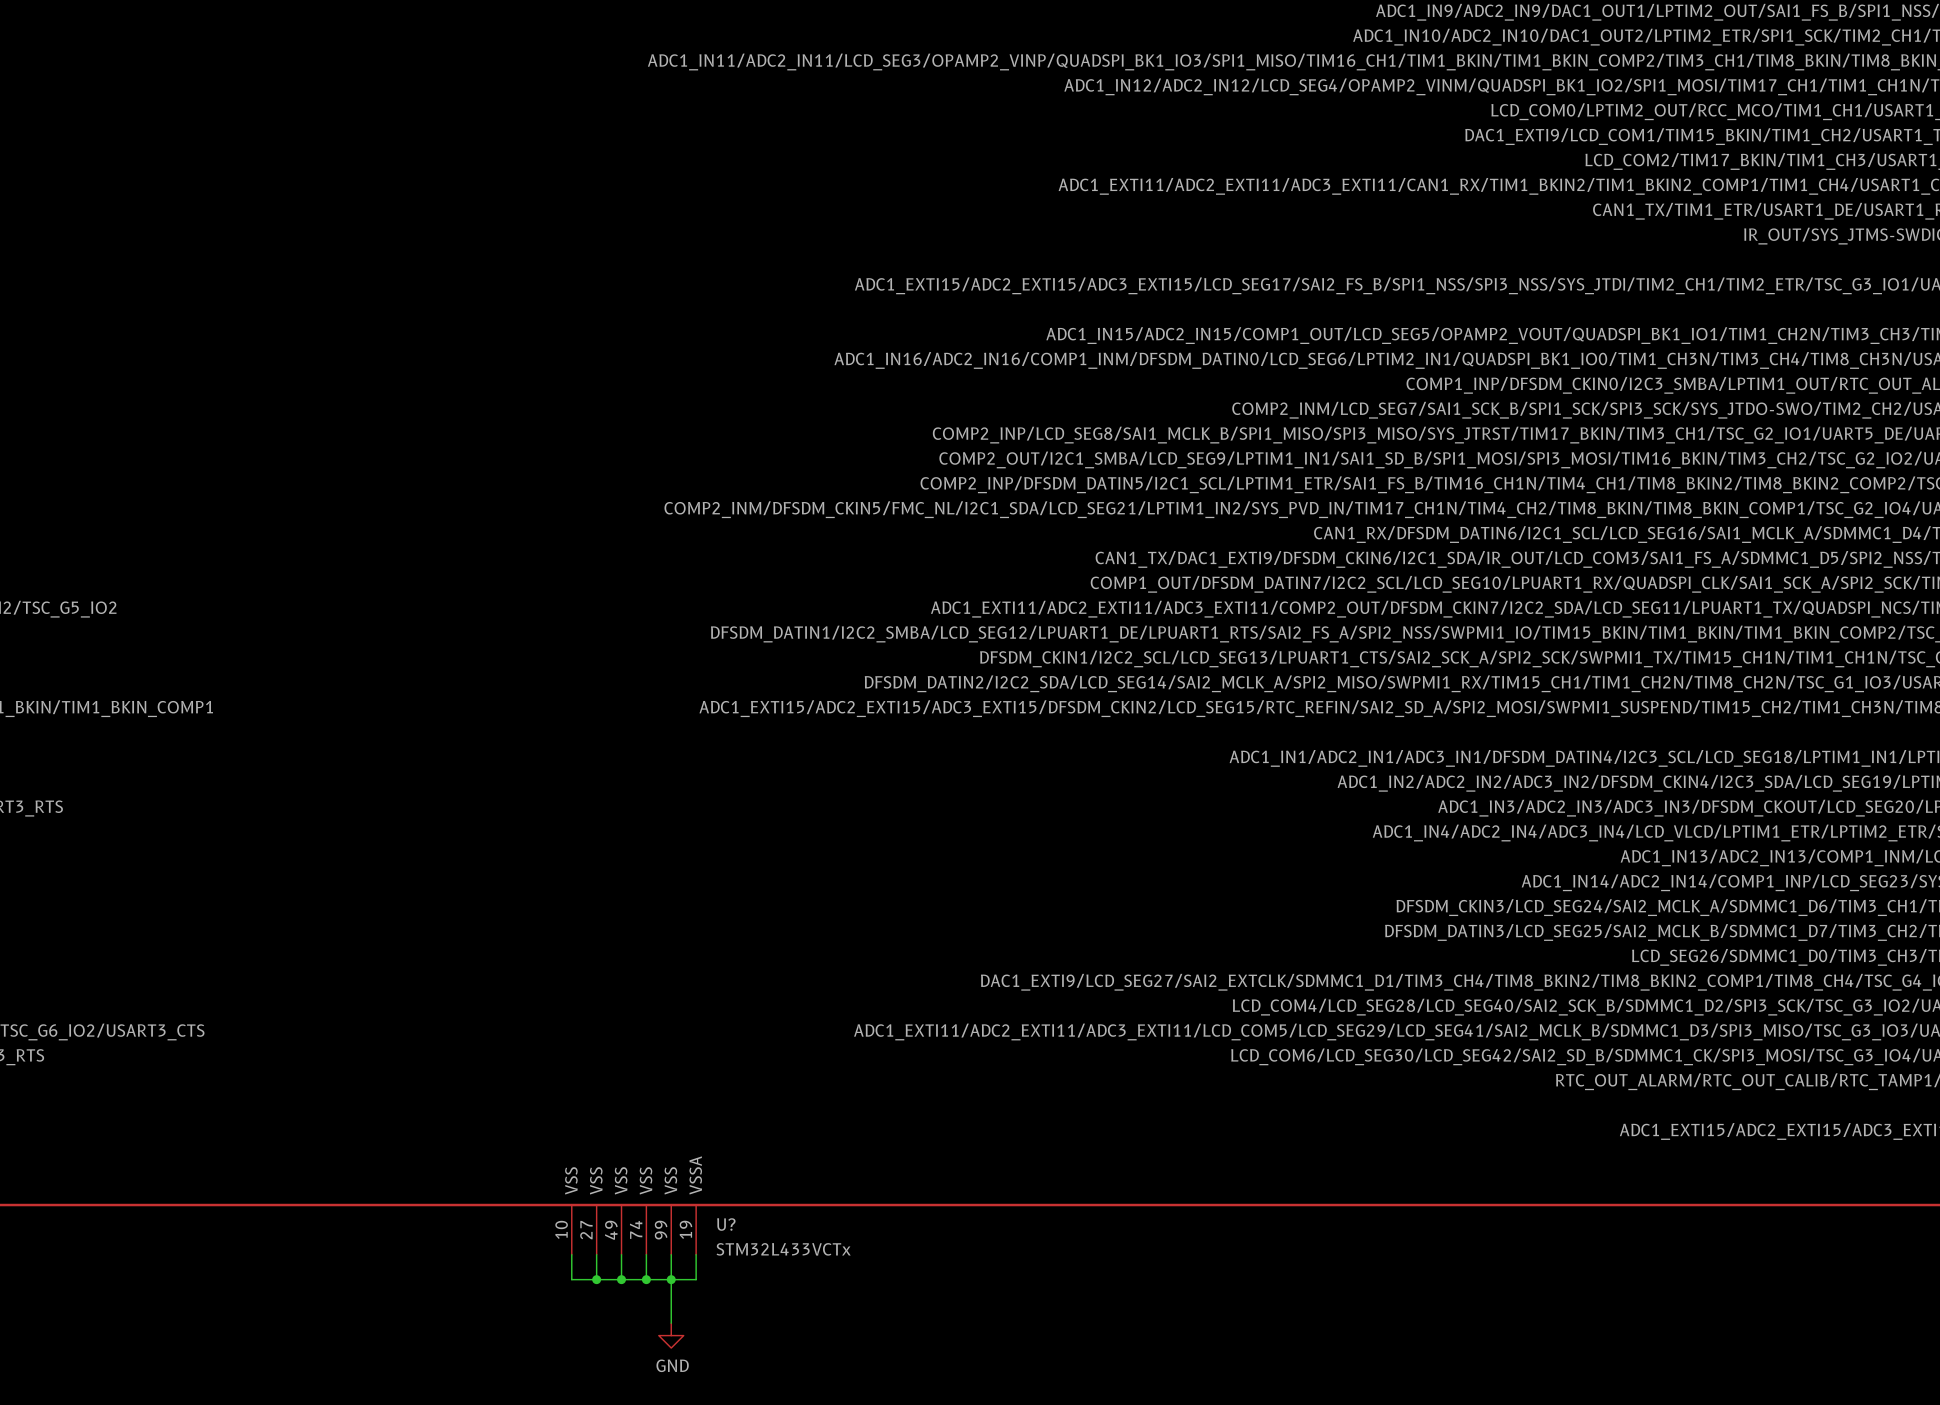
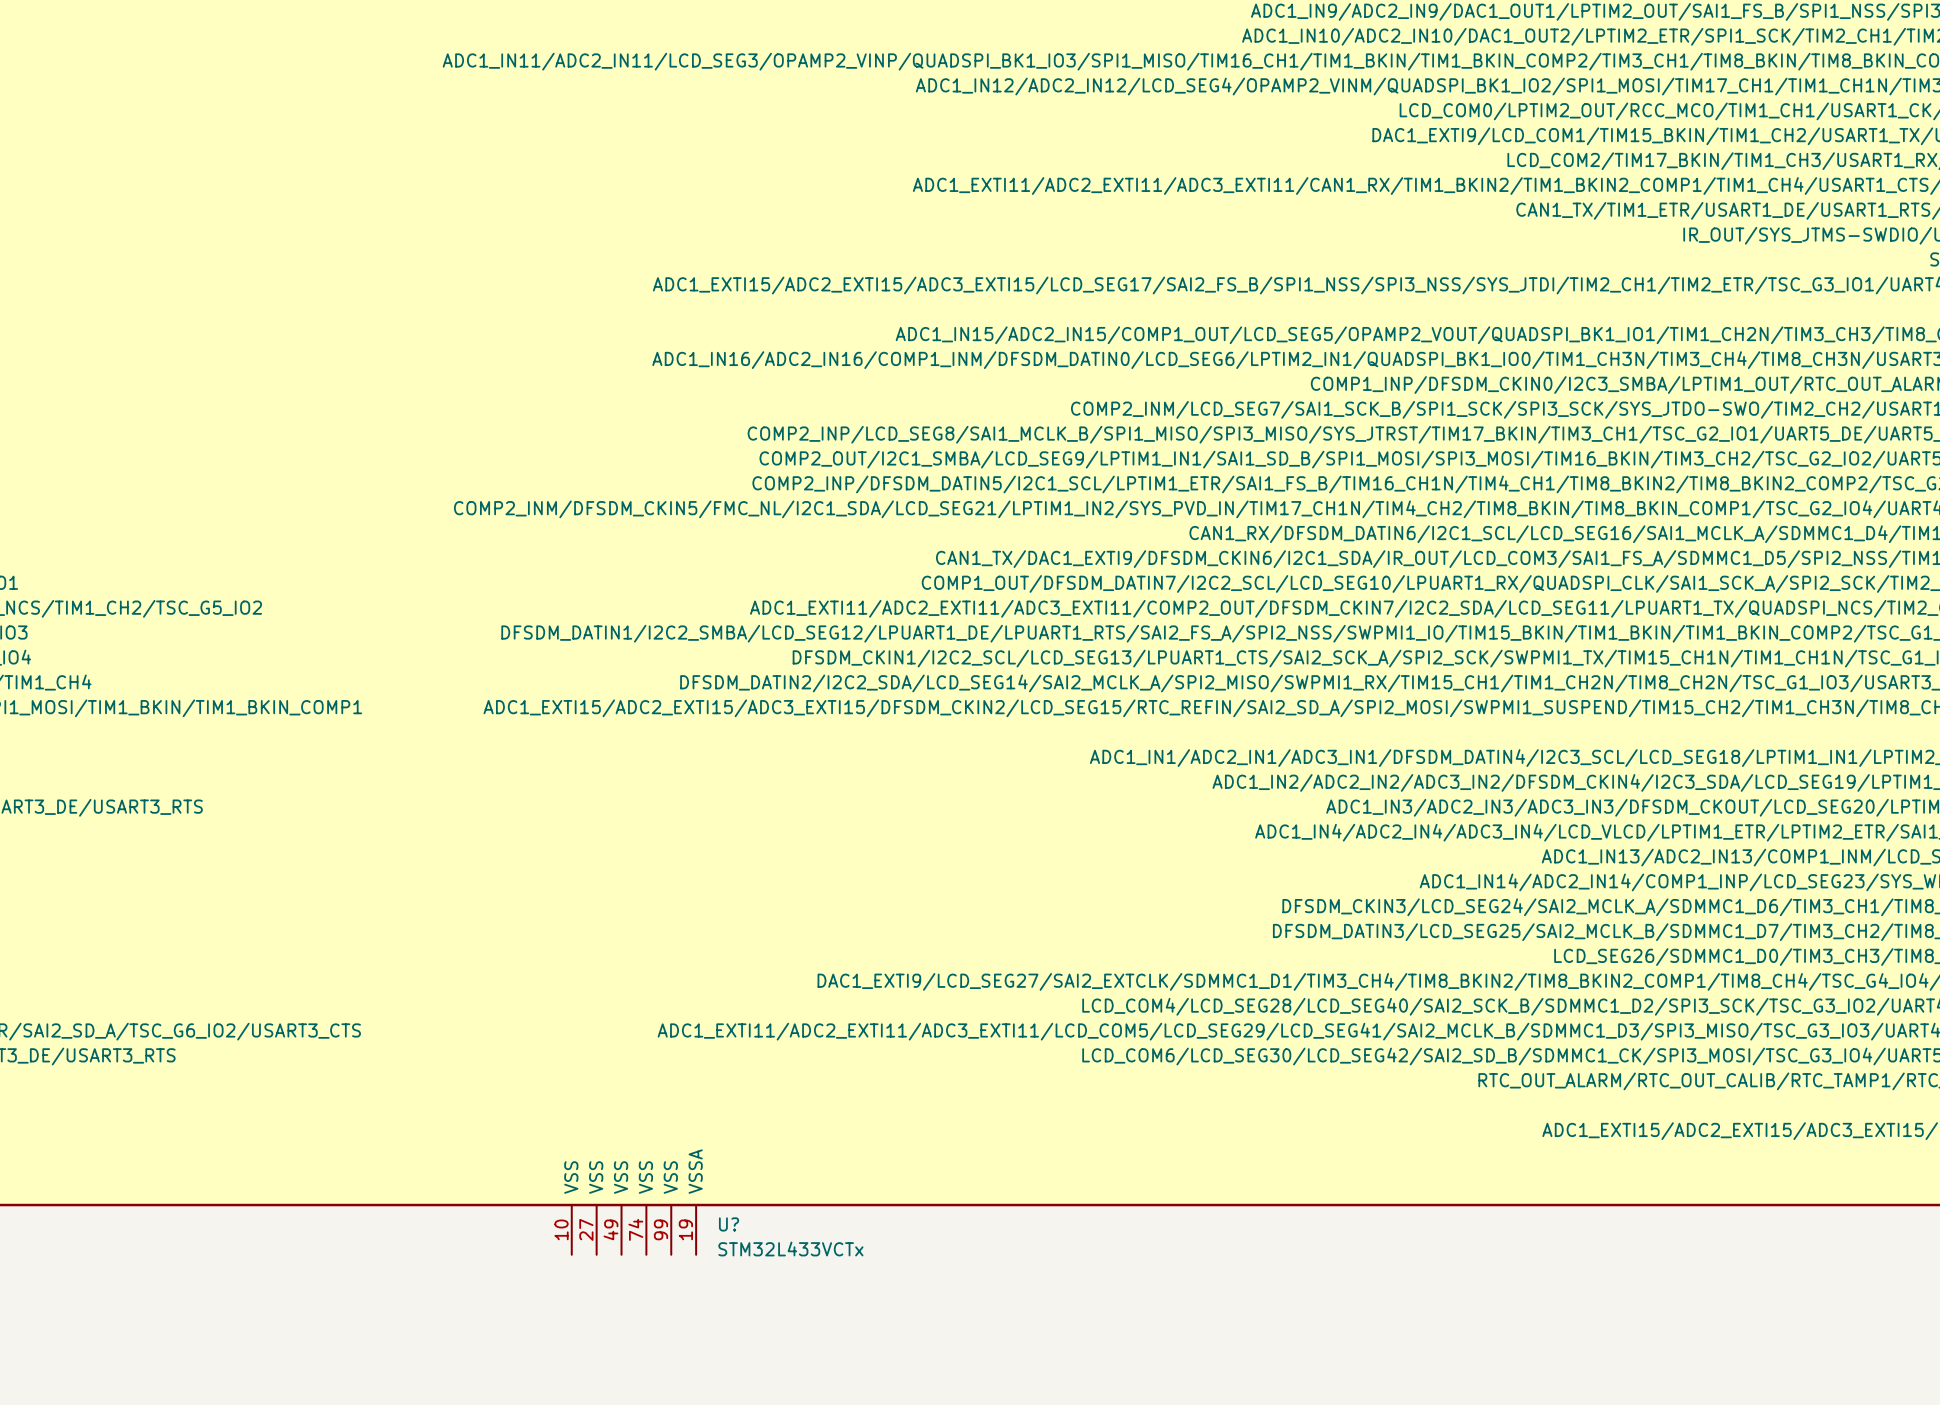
wire: (571, 1254) (571, 1279) (696, 1279) (696, 1254) -> none
wire: (596, 1254) (596, 1279) -> none
wire: (621, 1254) (621, 1279) -> none
wire: (646, 1254) (646, 1279) -> none
wire: (671, 1254) (671, 1323) -> none
junction: (596, 1279) -> none
junction: (621, 1279) -> none
junction: (646, 1279) -> none
junction: (671, 1279) -> none
power symbol: GND (671, 1335) -> none

